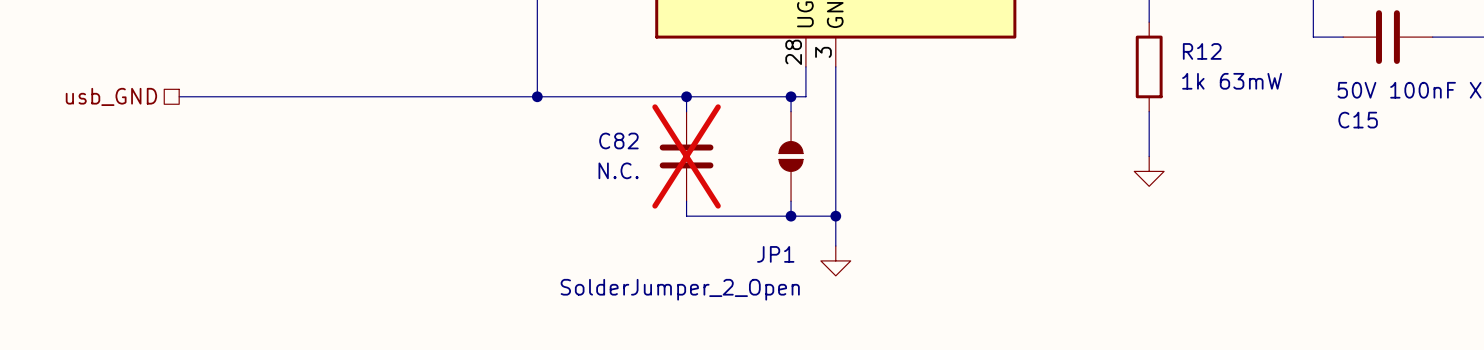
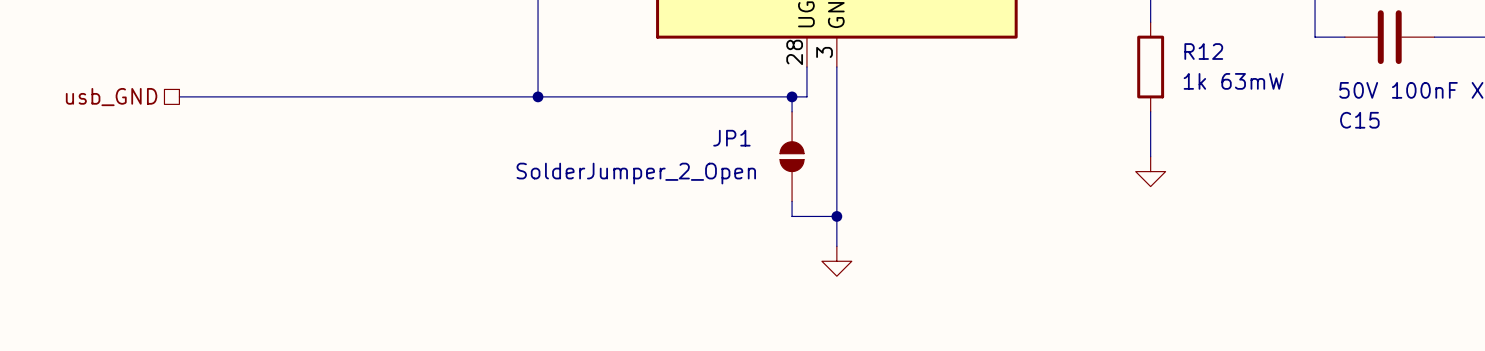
wire: (686, 96) (686, 111) -> none
junction: (686, 96) -> none
C82: N.C. (686, 156) -> none
wire: (686, 201) (686, 216) (791, 216) -> none
junction: (791, 216) -> none
JP1 name position: JP1 (775, 254) -> JP1 (731, 138)
JP1 value position: SolderJumper_2_Open (680, 289) -> SolderJumper_2_Open (636, 173)

